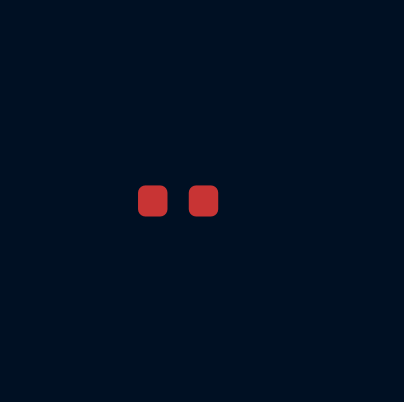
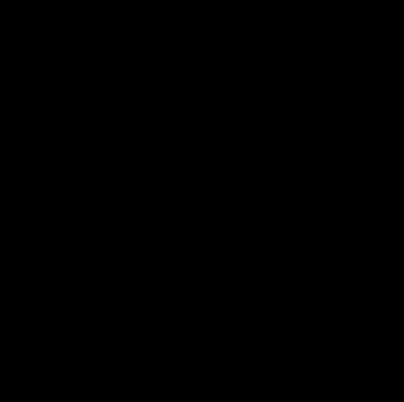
part: (178, 200) -> none

